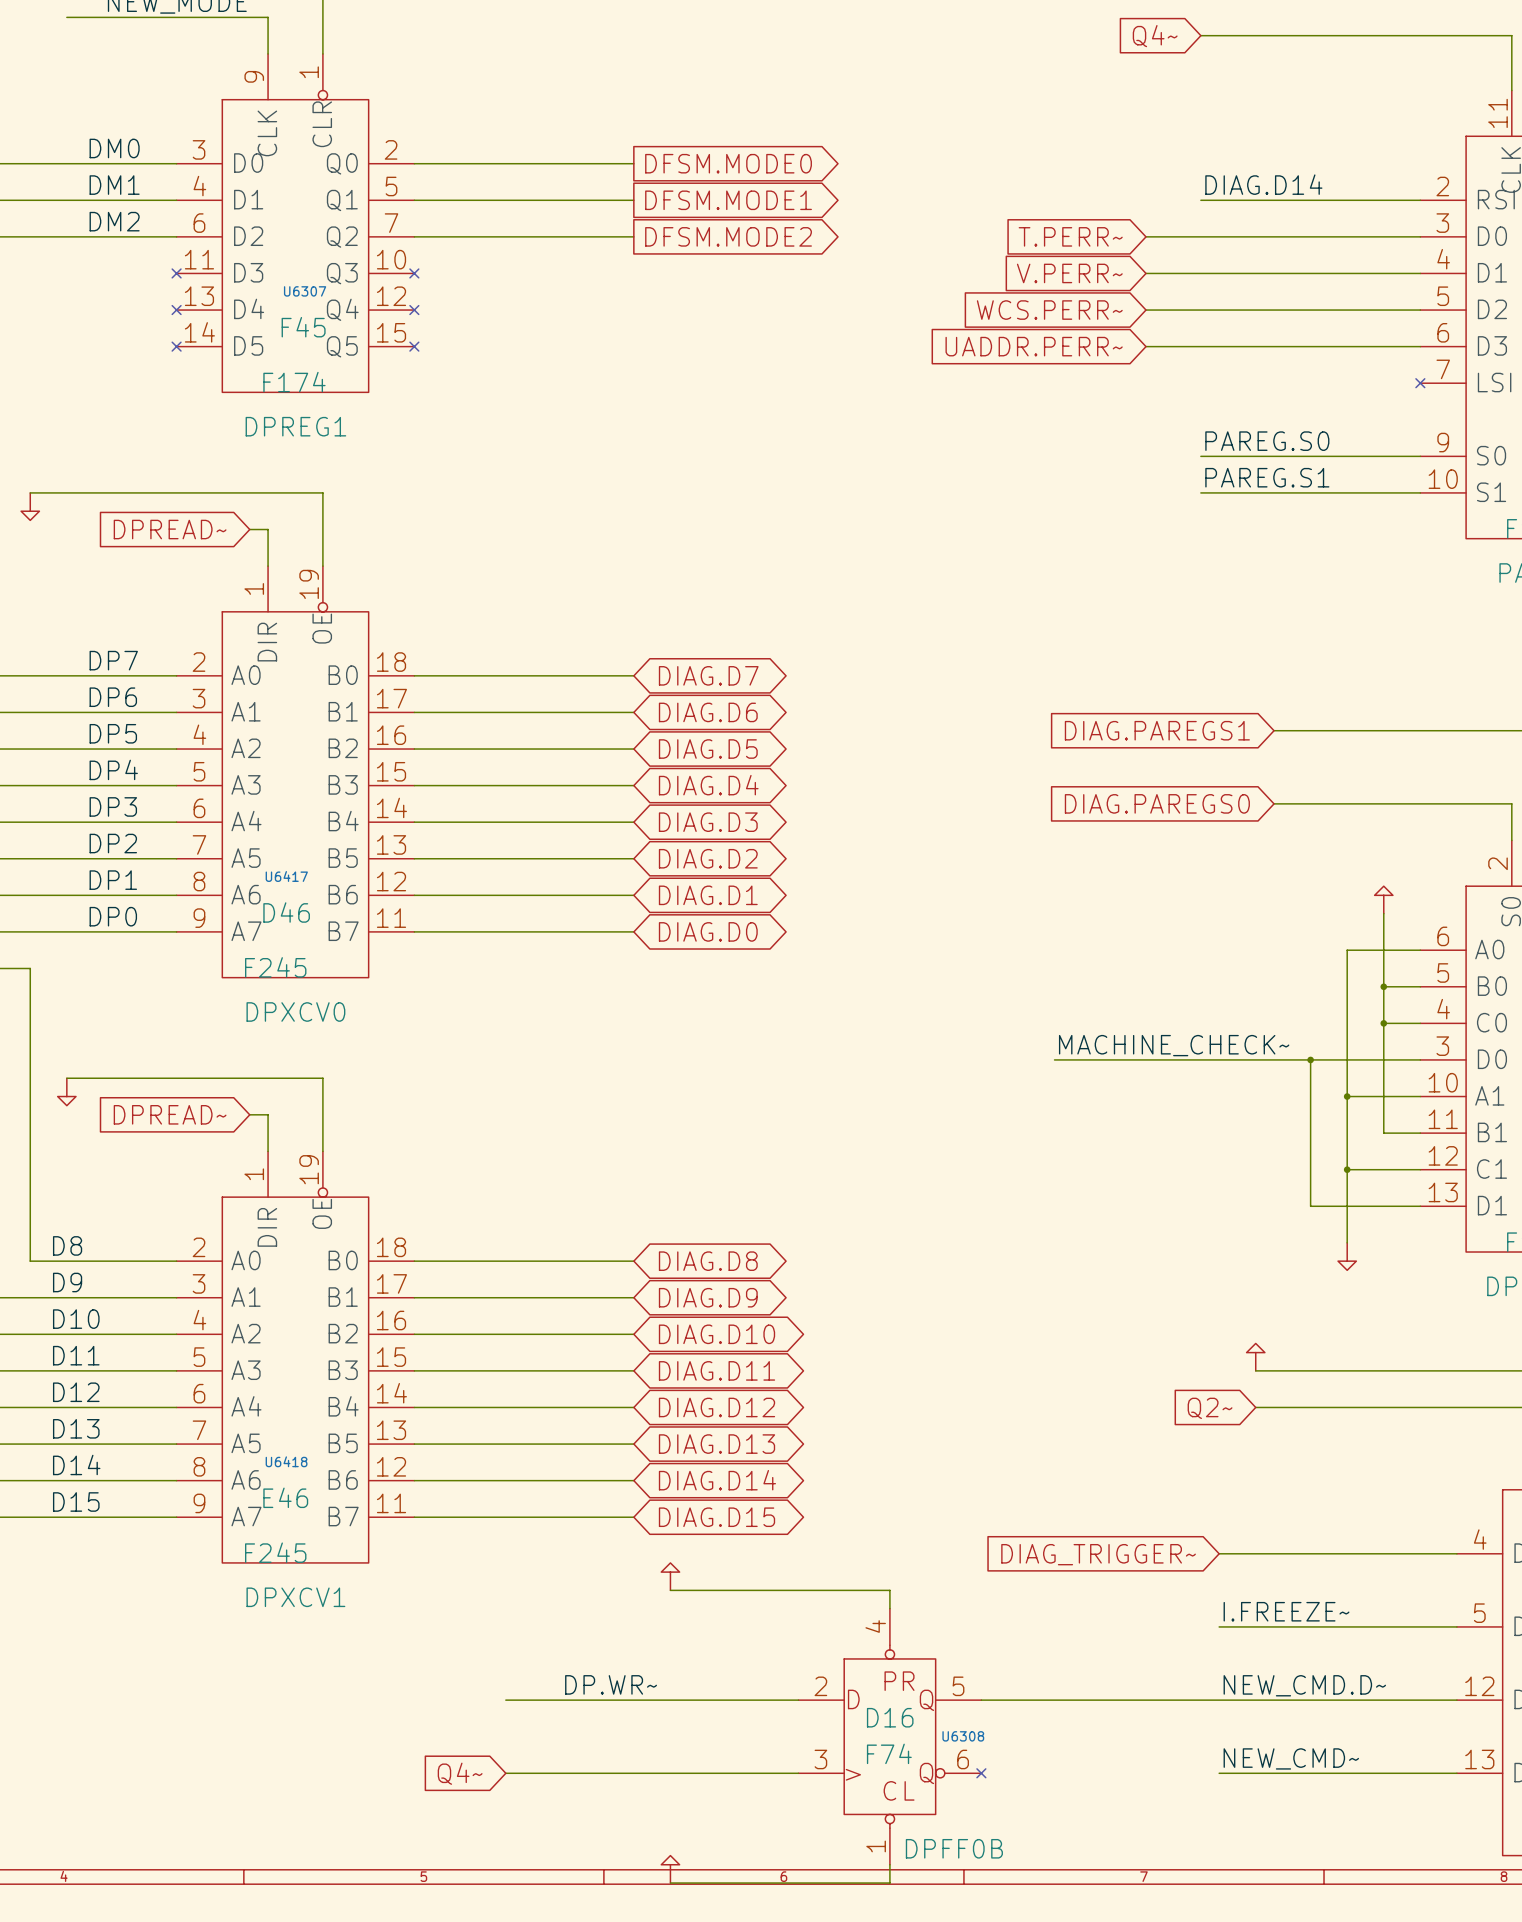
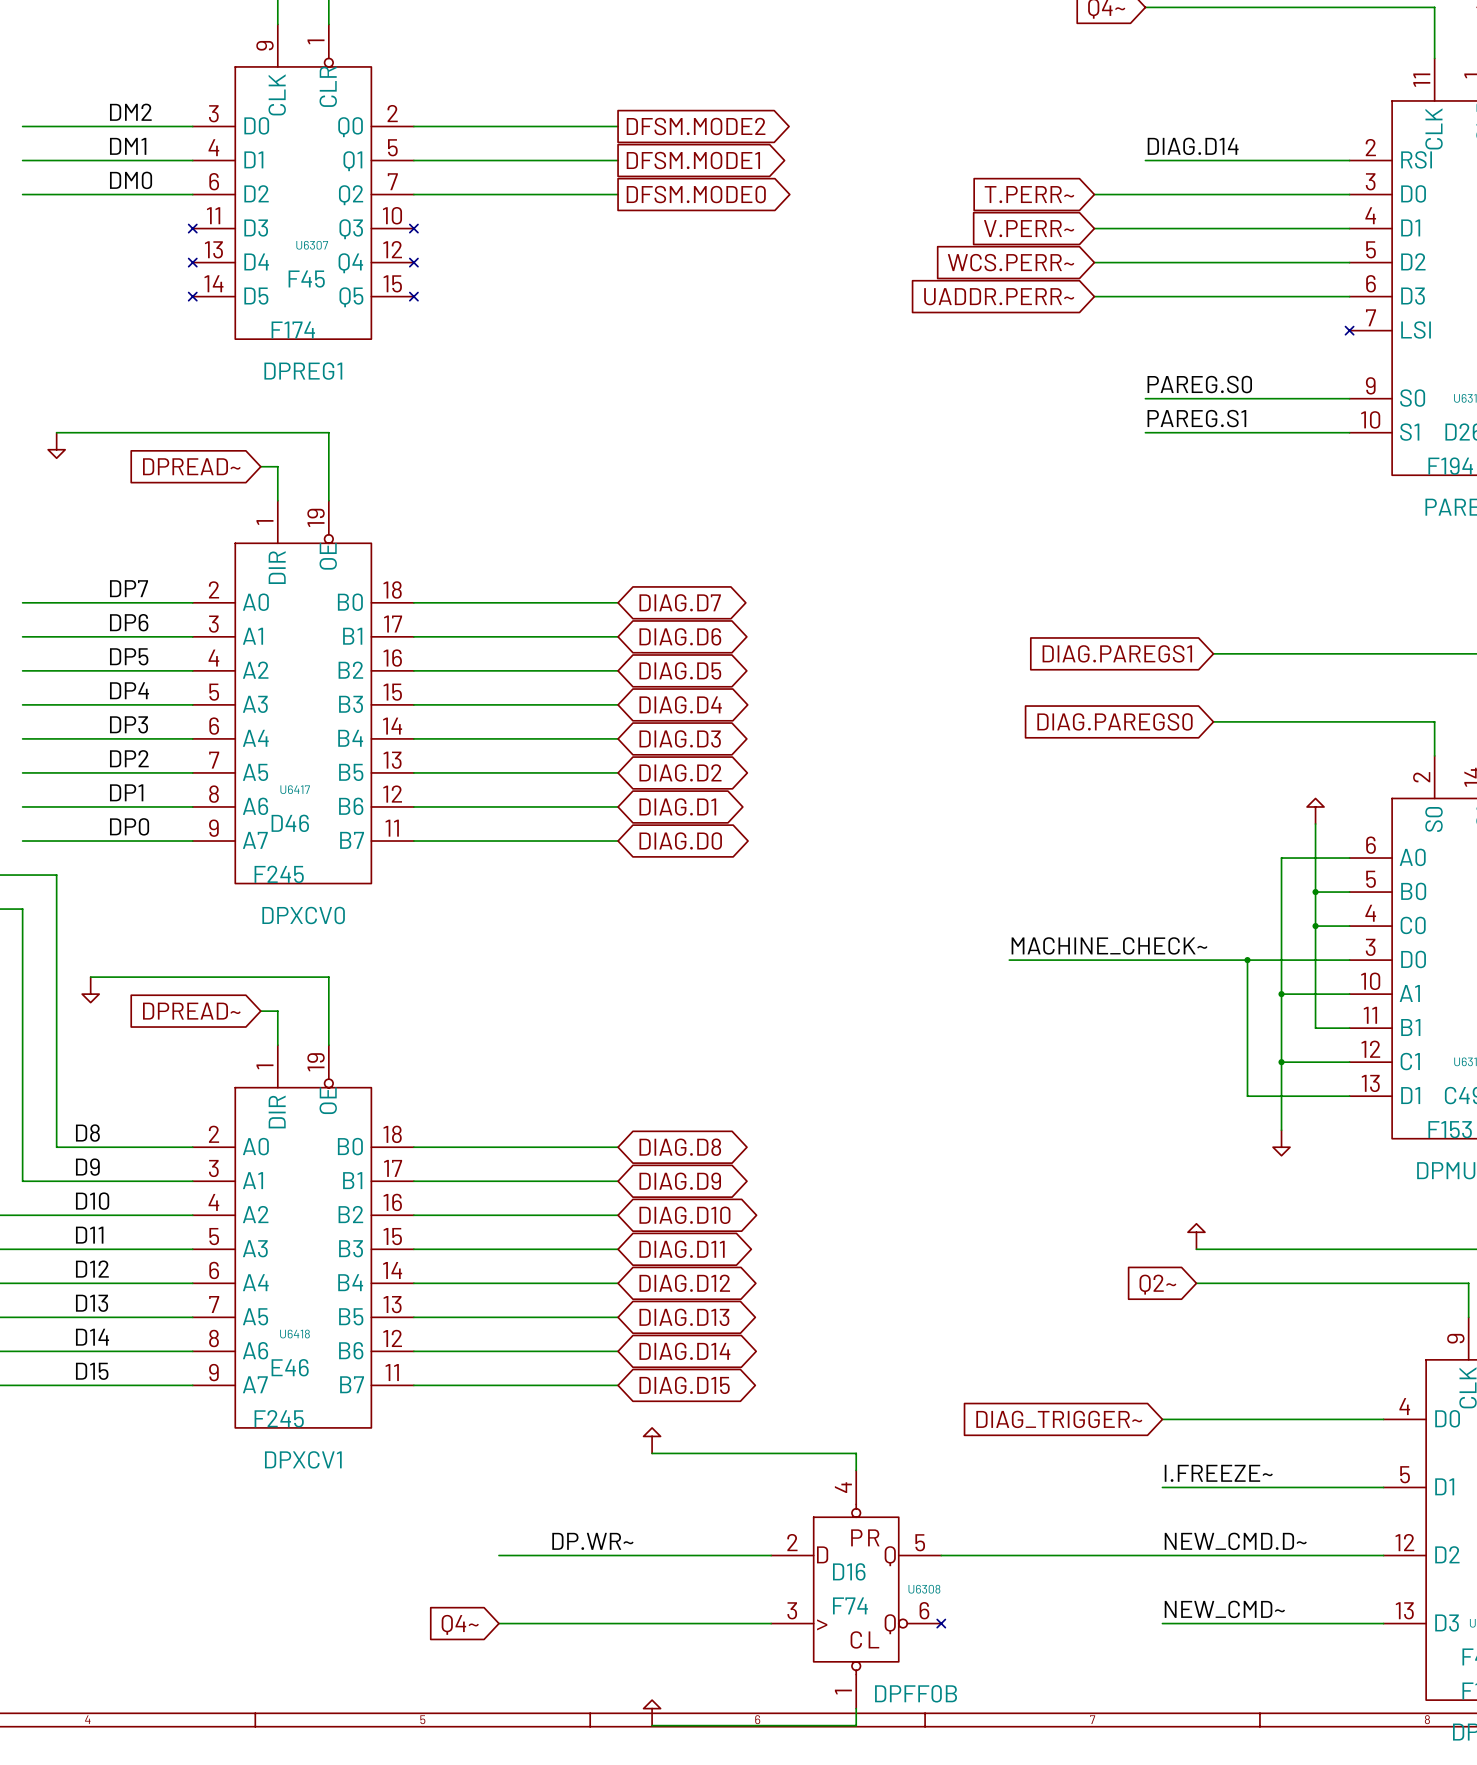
label: DM0 (114, 148) -> DM2 (130, 112)
global label: DFSM.MODE0 (728, 163) -> DFSM.MODE2 (696, 126)
label: DM2 (114, 221) -> DM0 (131, 180)
global label: DFSM.MODE2 (728, 236) -> DFSM.MODE0 (696, 194)

